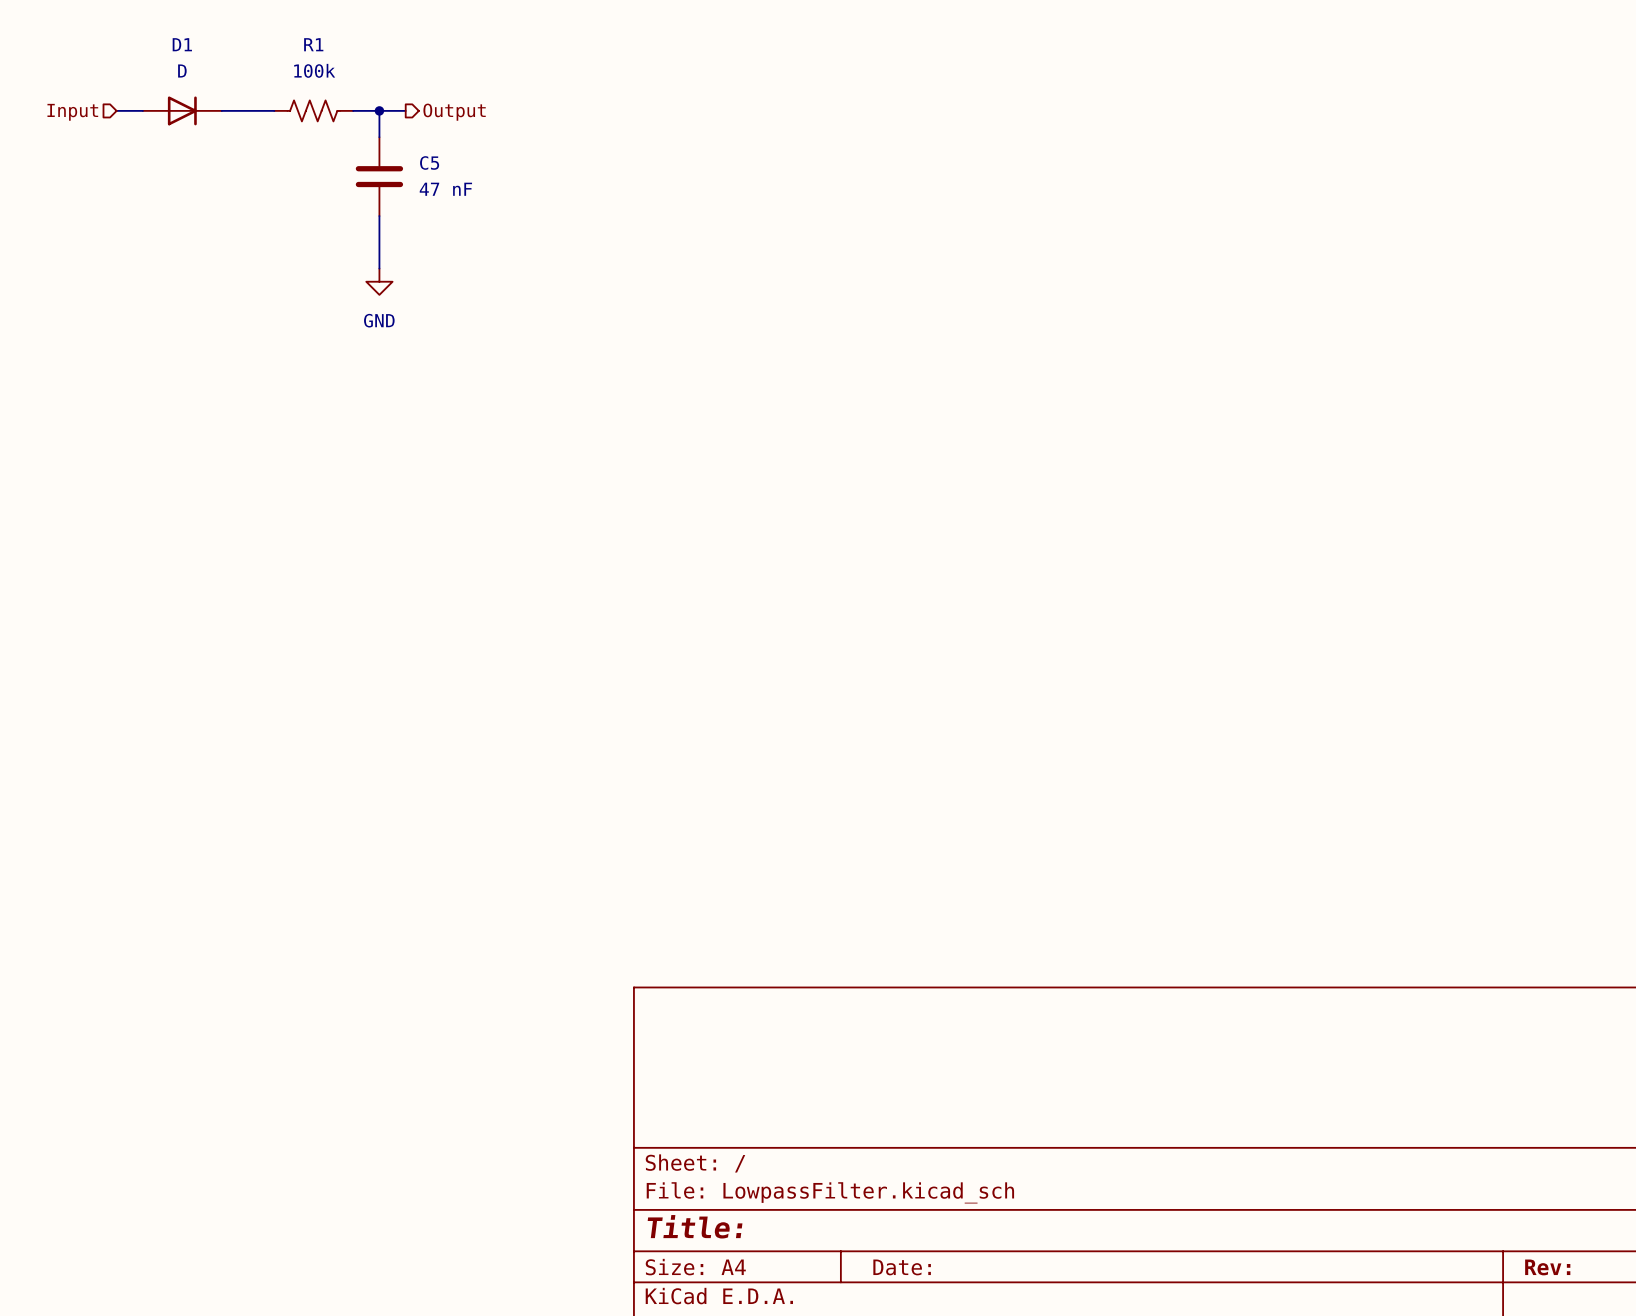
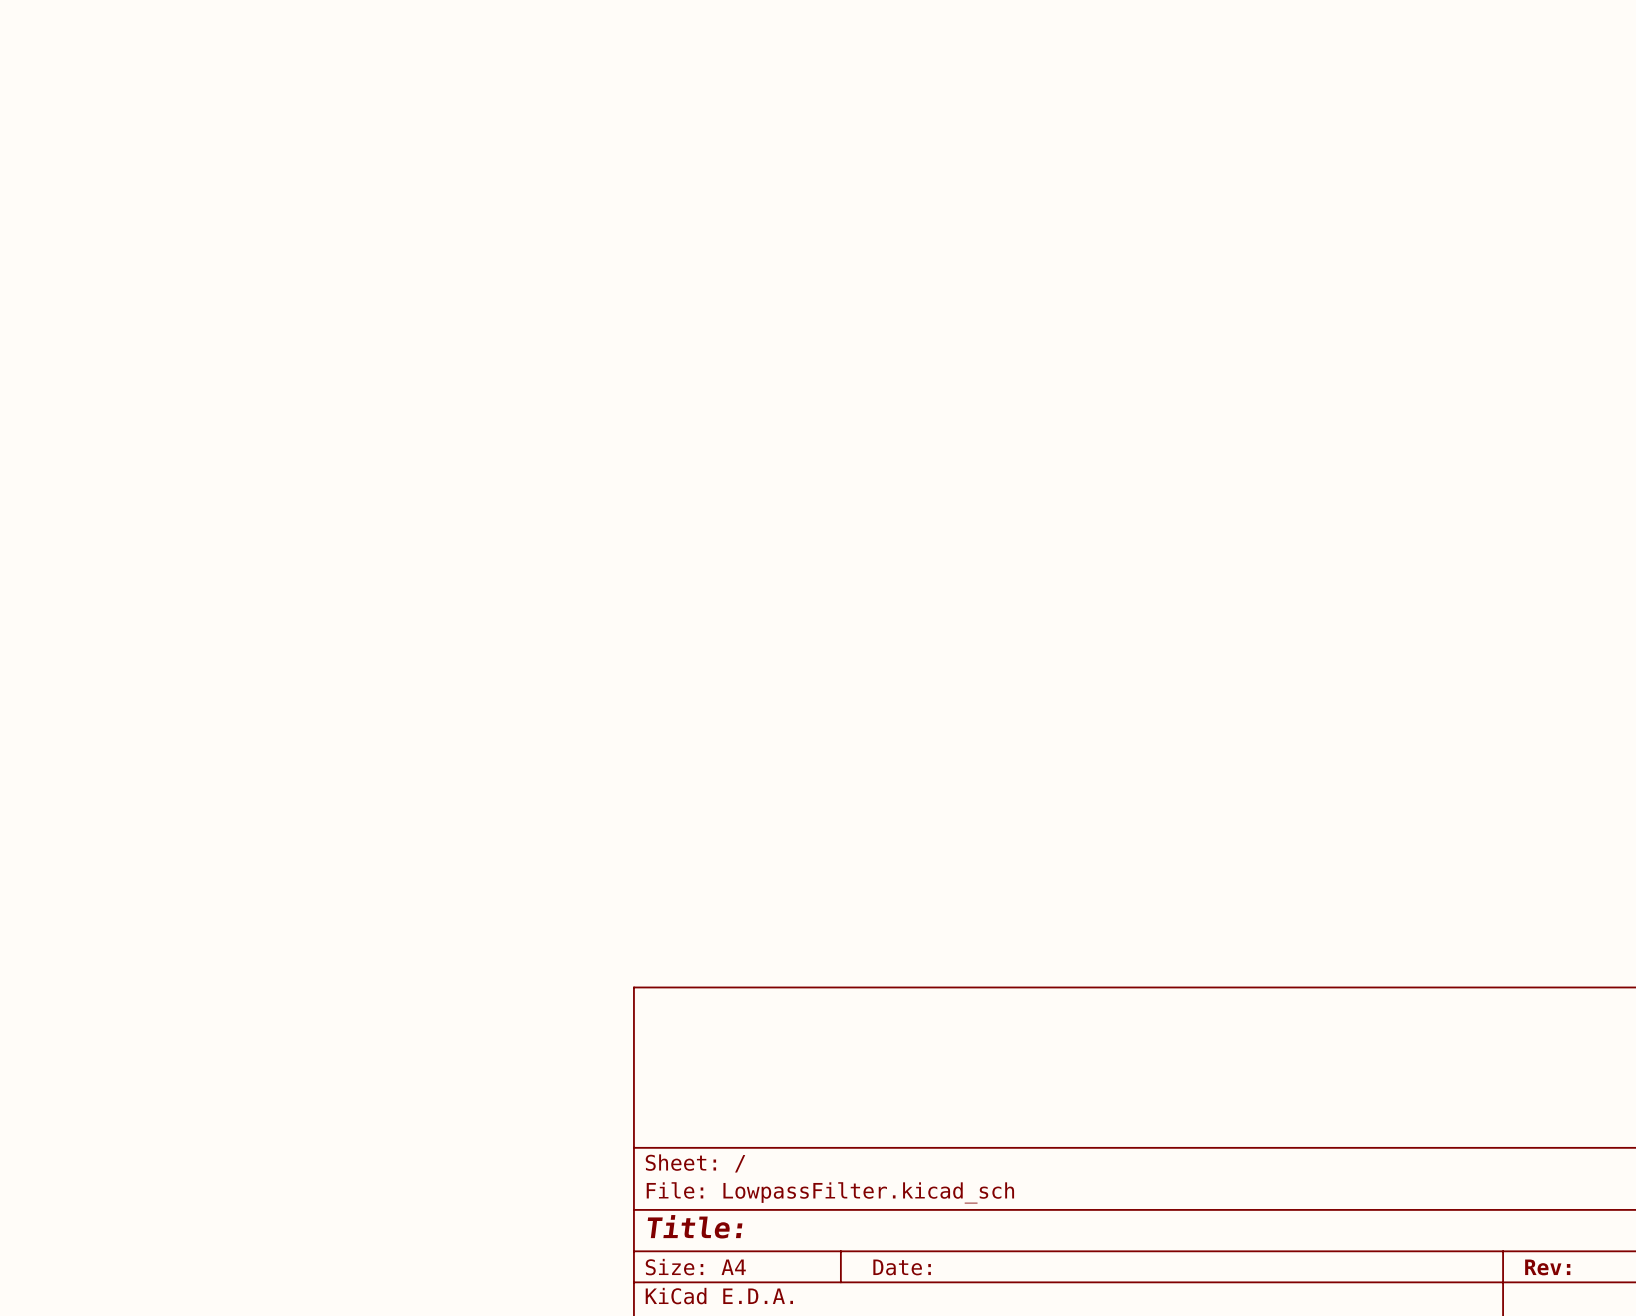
wire: (116, 110) (142, 110) -> none
D1: D (182, 110) -> none
wire: (221, 110) (274, 110) -> none
R1: 100k (313, 110) -> none
wire: (353, 110) (405, 110) -> none
wire: (379, 110) (379, 137) -> none
junction: (379, 110) -> none
hierarchical label: Input (72, 112) -> none
hierarchical label: Output (454, 112) -> none
C5: 47 nF (379, 176) -> none
wire: (379, 216) (379, 268) -> none
power symbol: GND (379, 281) -> none

